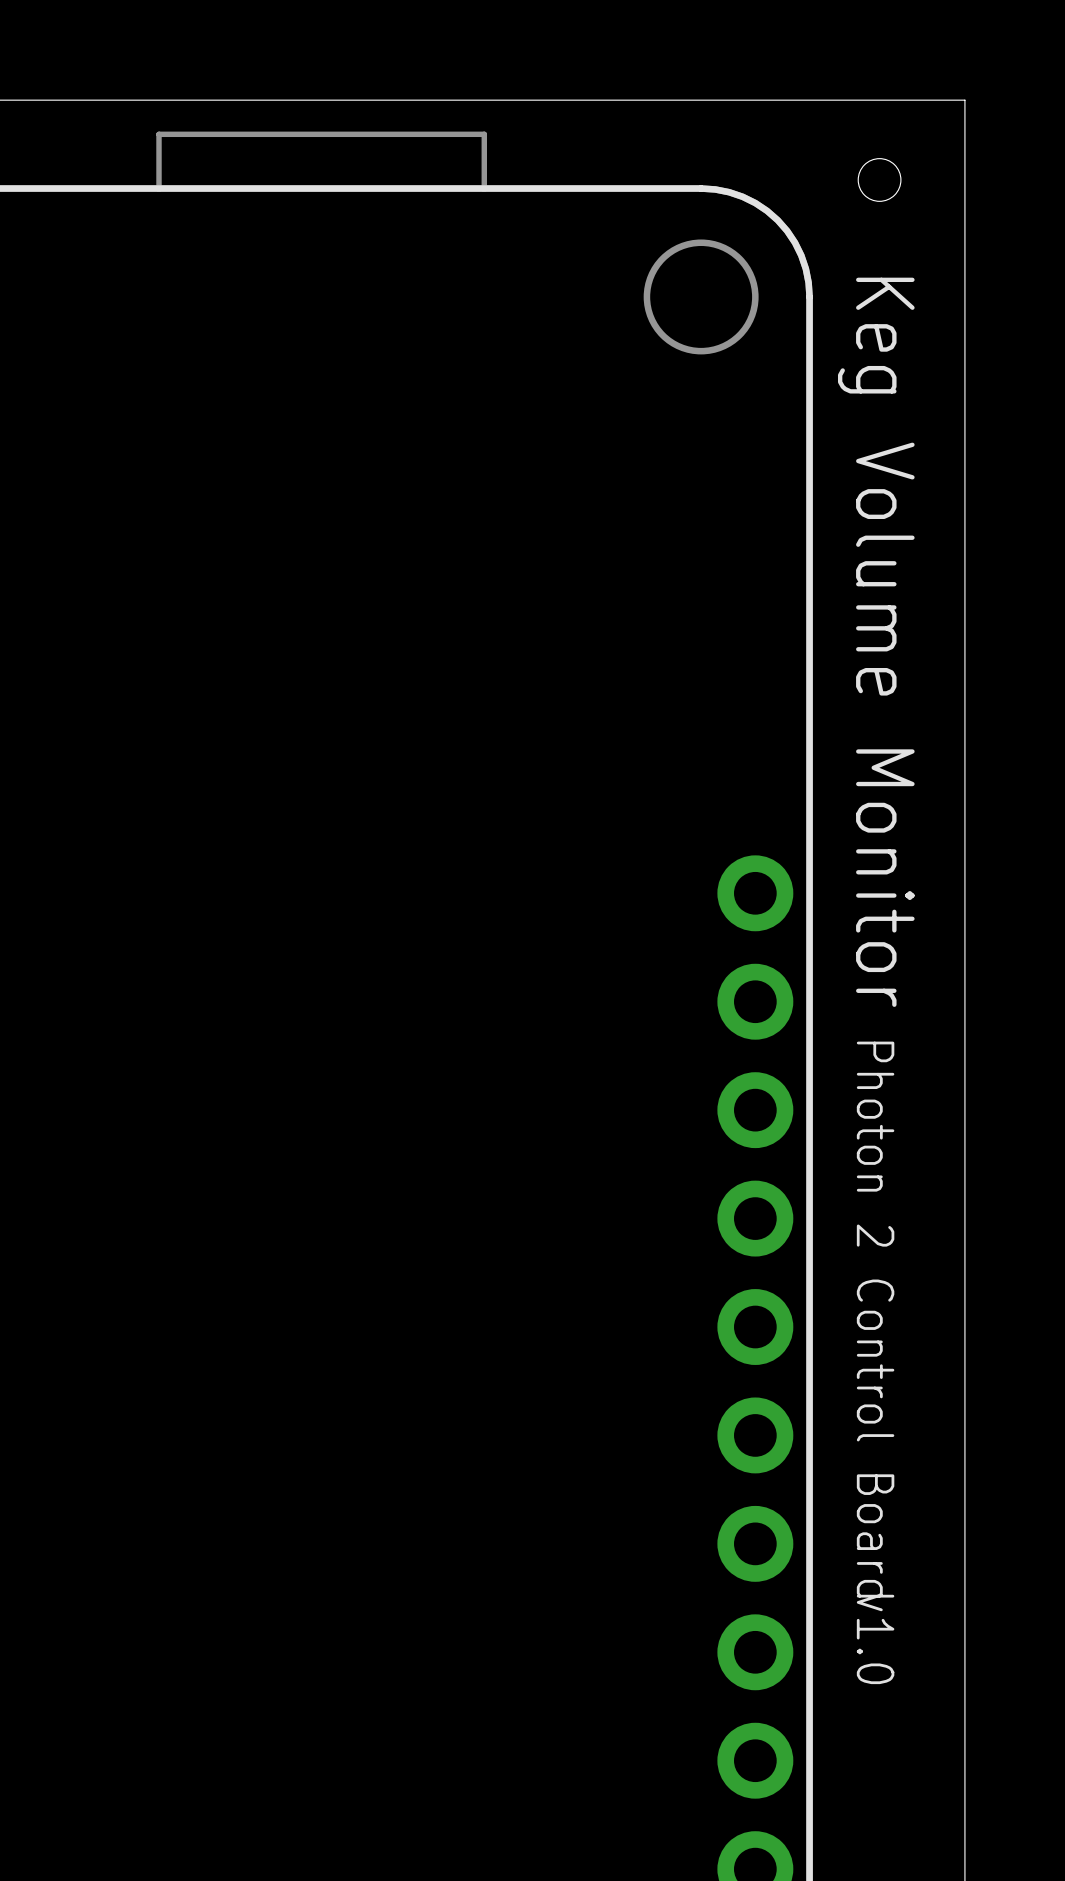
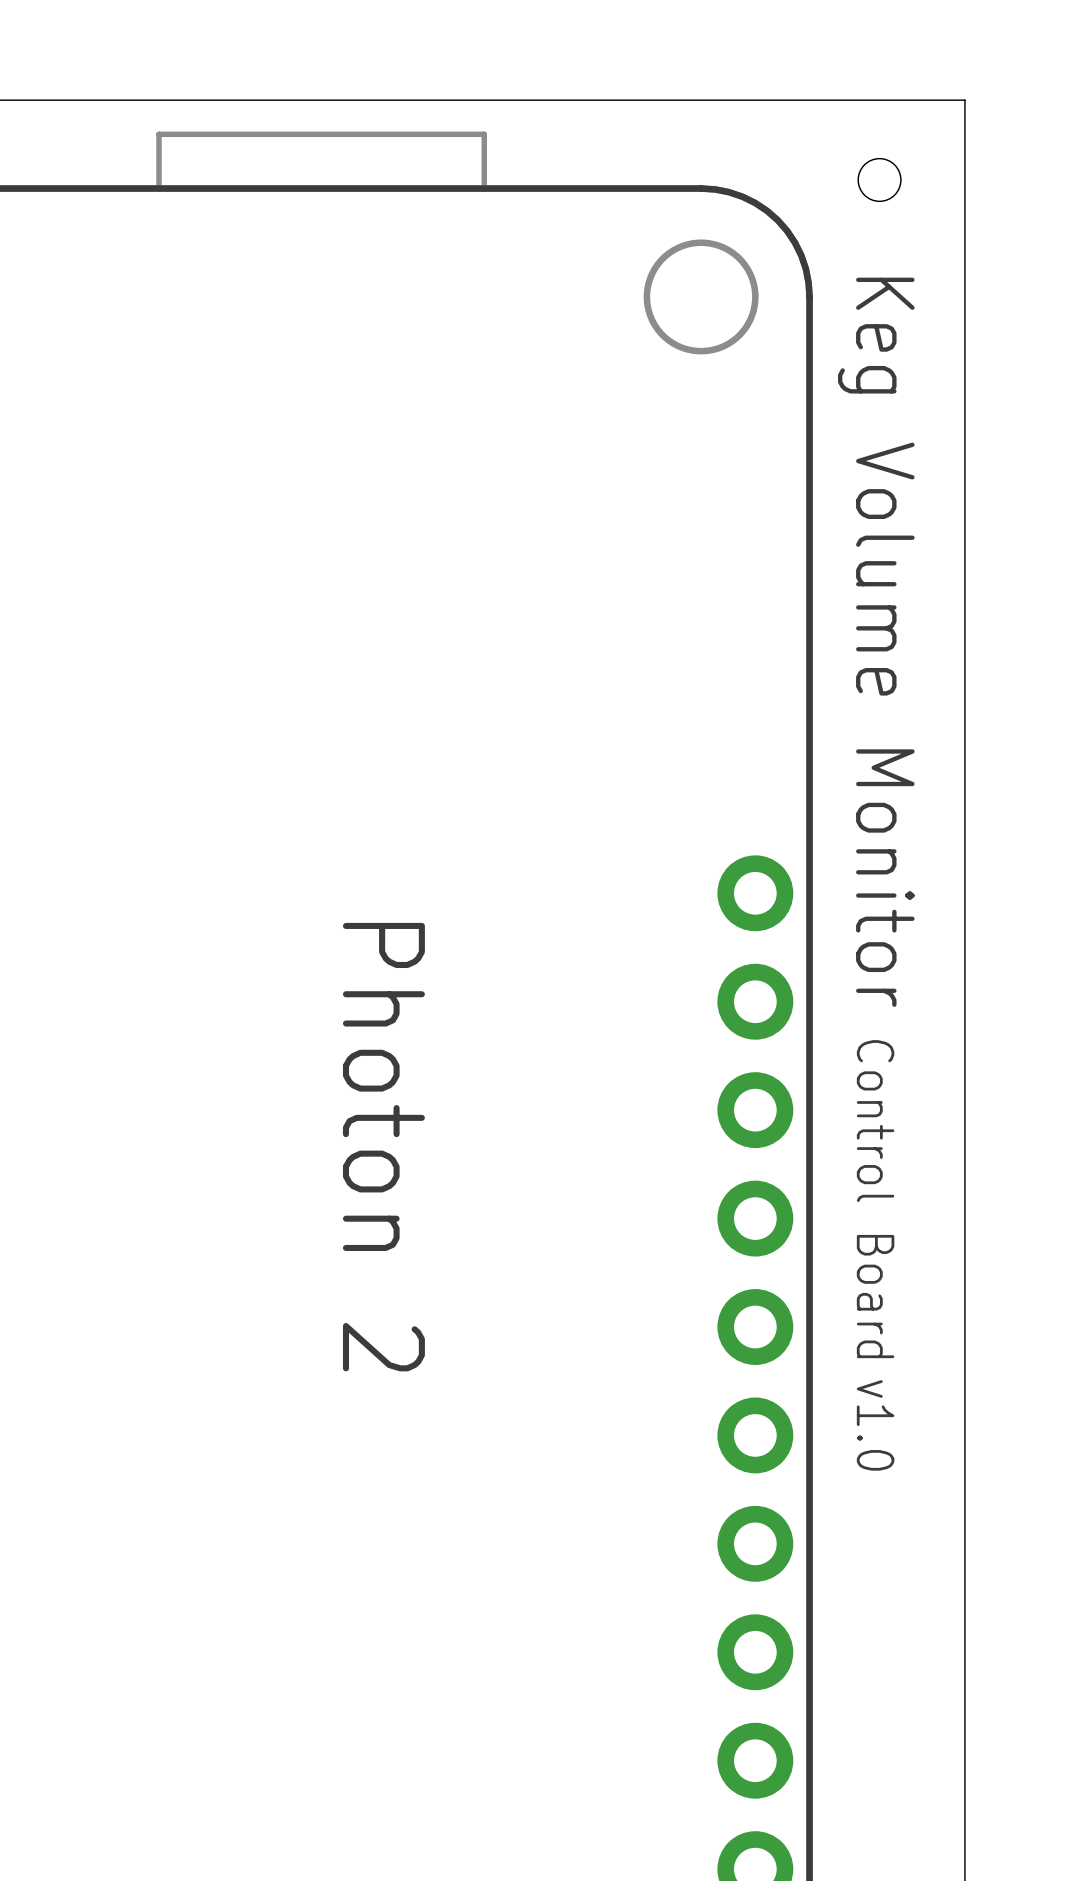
text: none -> Photon 2 (383, 1147)
text: Photon 2 Control Board (875, 1319) -> Control Board (875, 1199)
text position: v1.0 (875, 1638) -> v1.0 (875, 1425)

